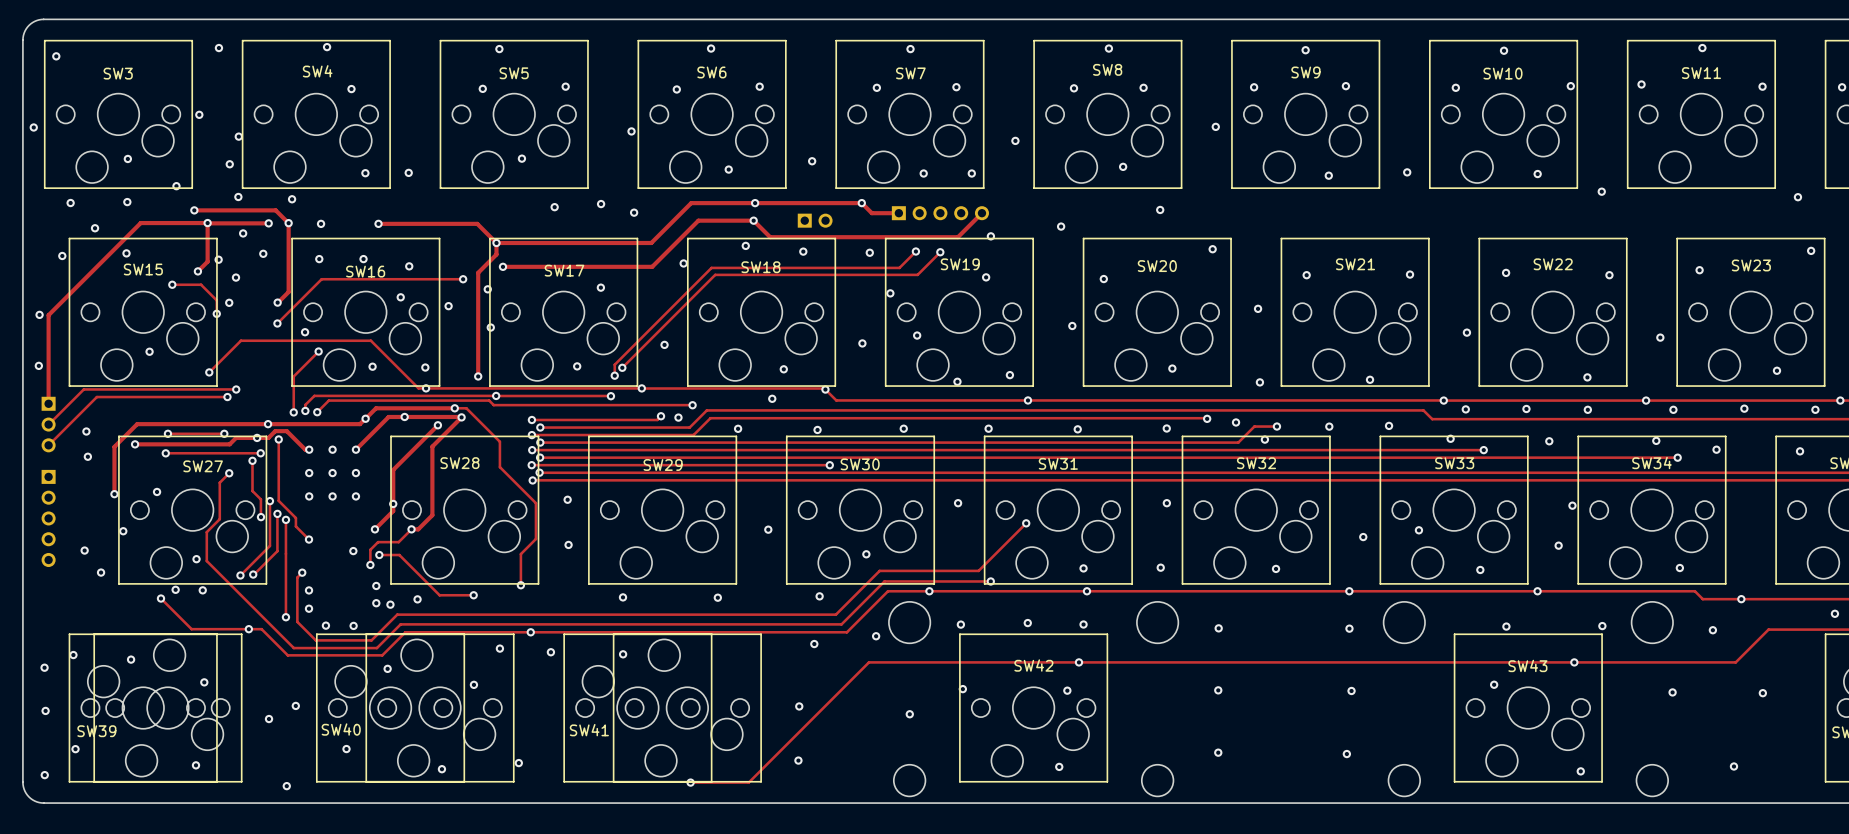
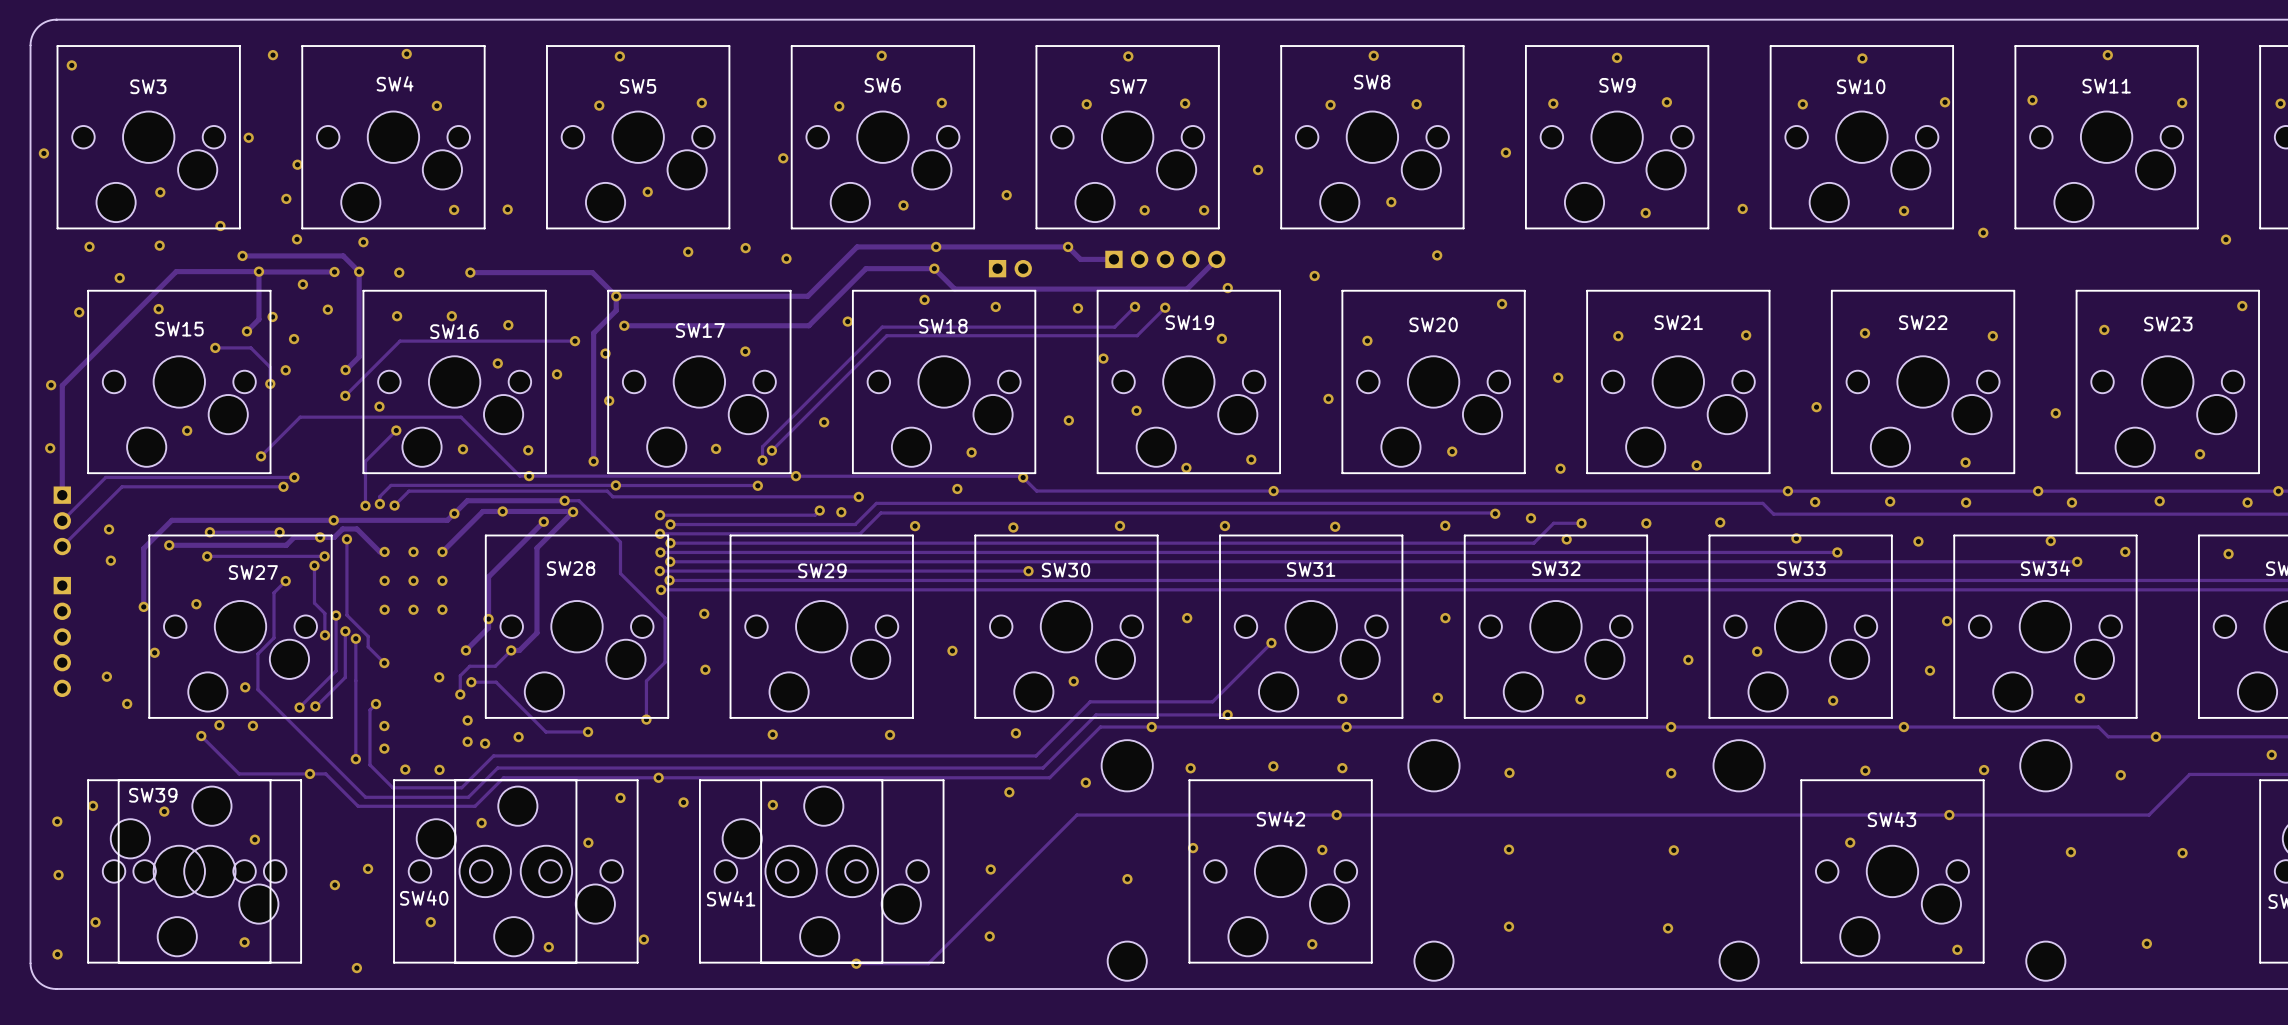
SW39 name position: SW39 (96, 731) -> SW39 (153, 795)

